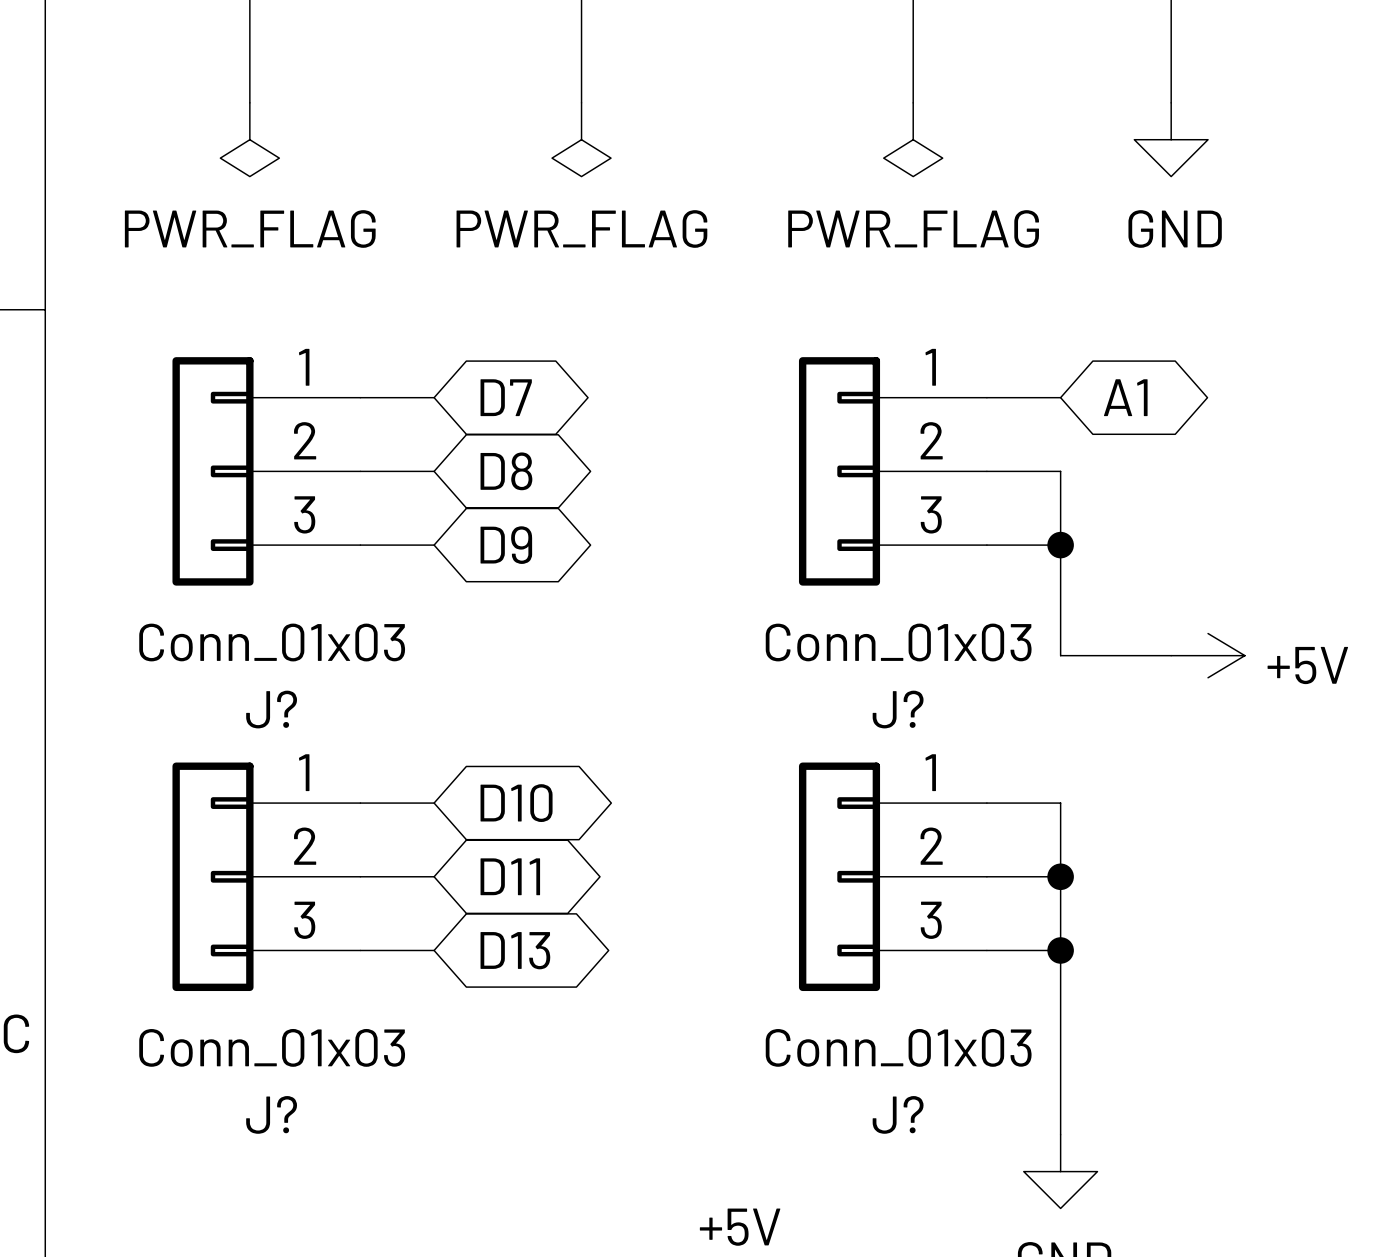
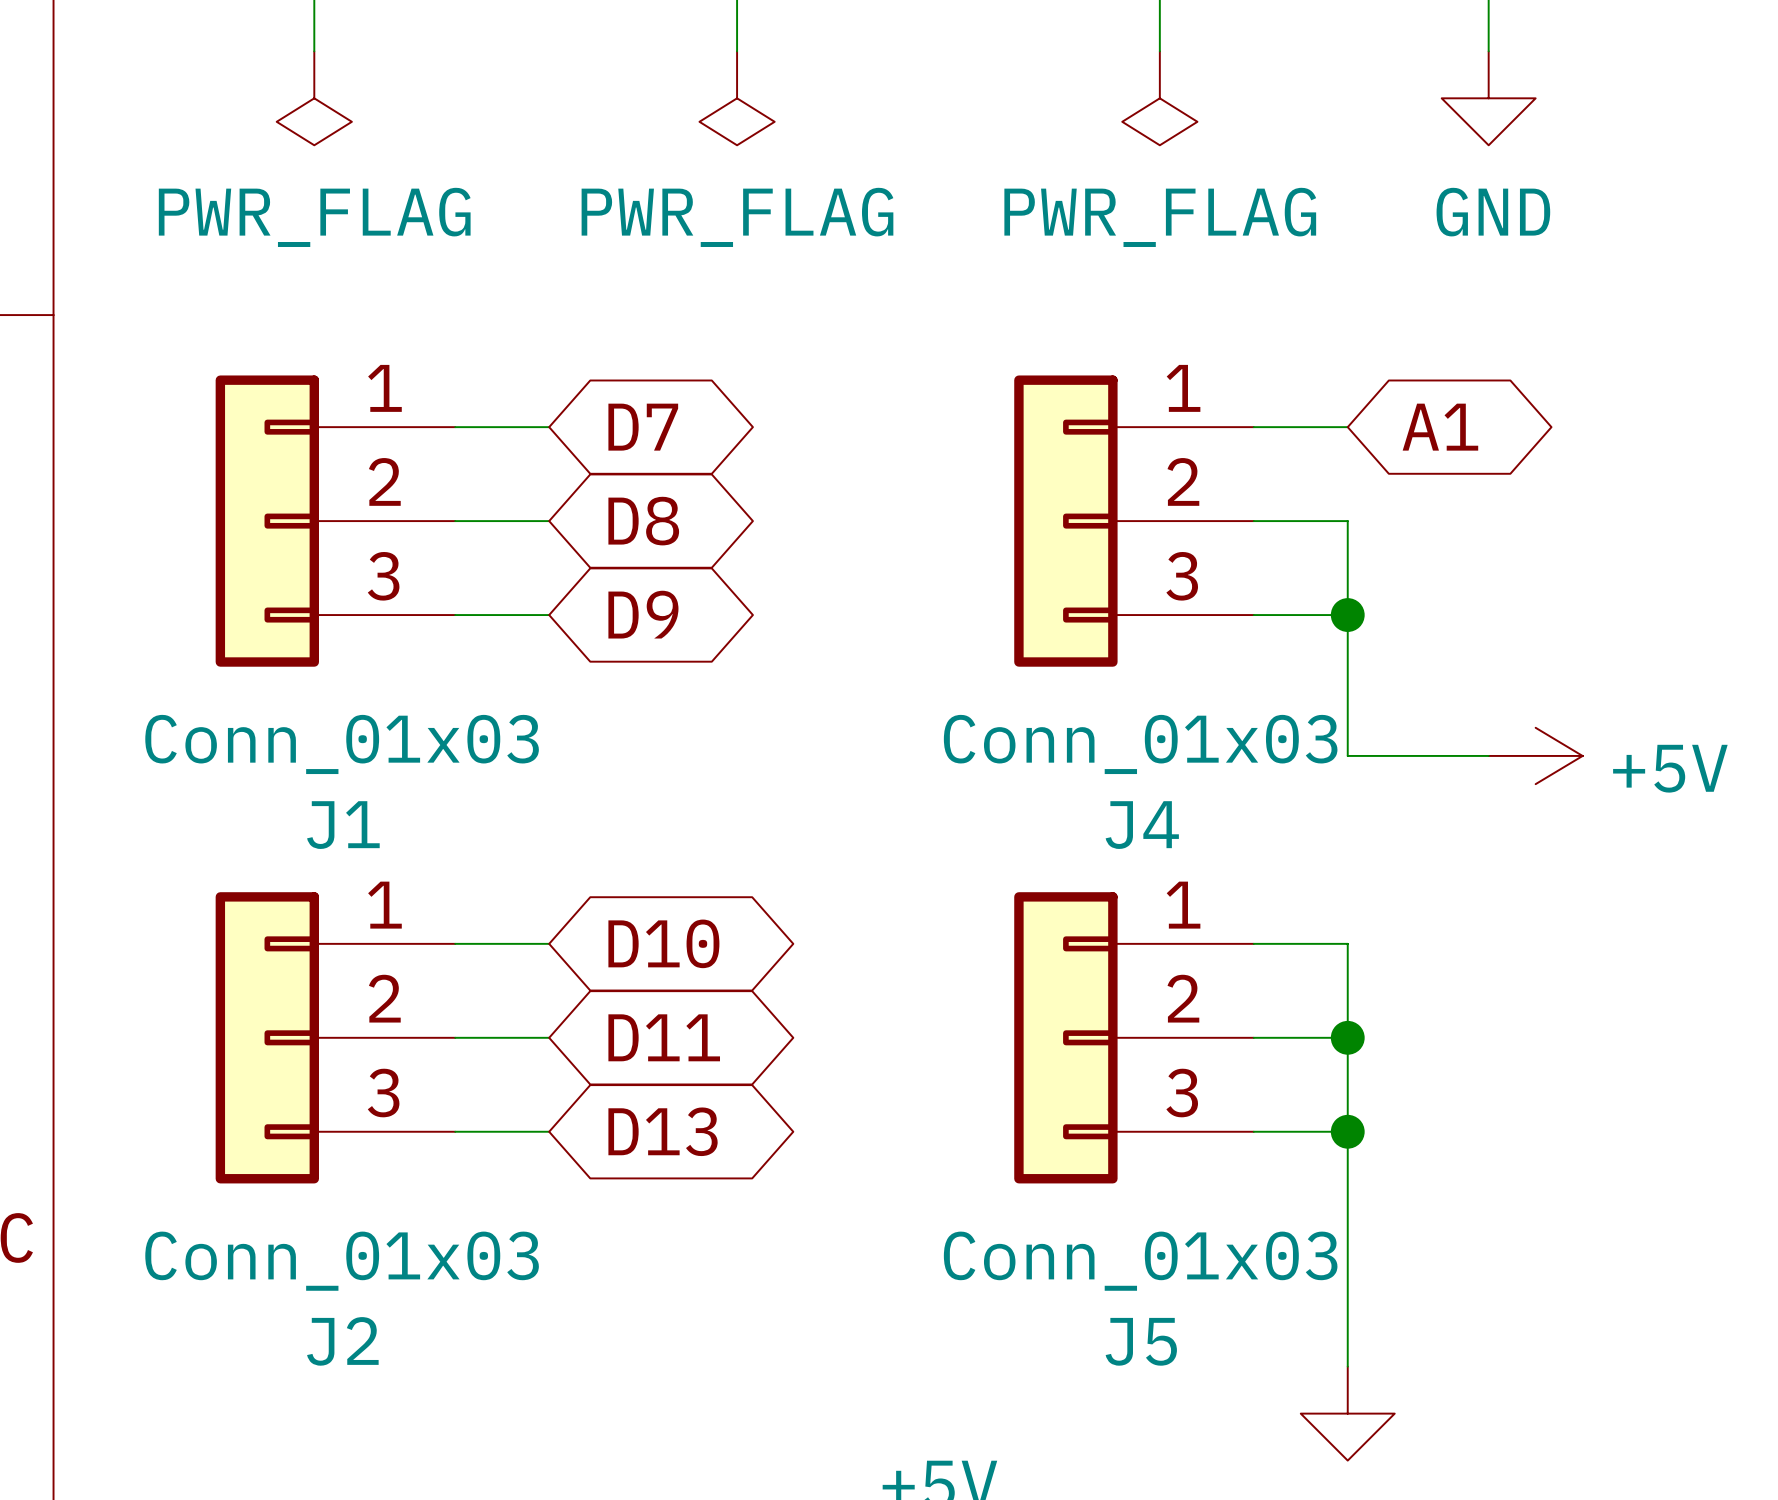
J? name: J? (271, 709) -> J1 (343, 825)
J? name: J? (898, 709) -> J4 (1142, 825)
J? name: J? (271, 1114) -> J2 (342, 1341)
J? name: J? (898, 1114) -> J5 (1141, 1341)

